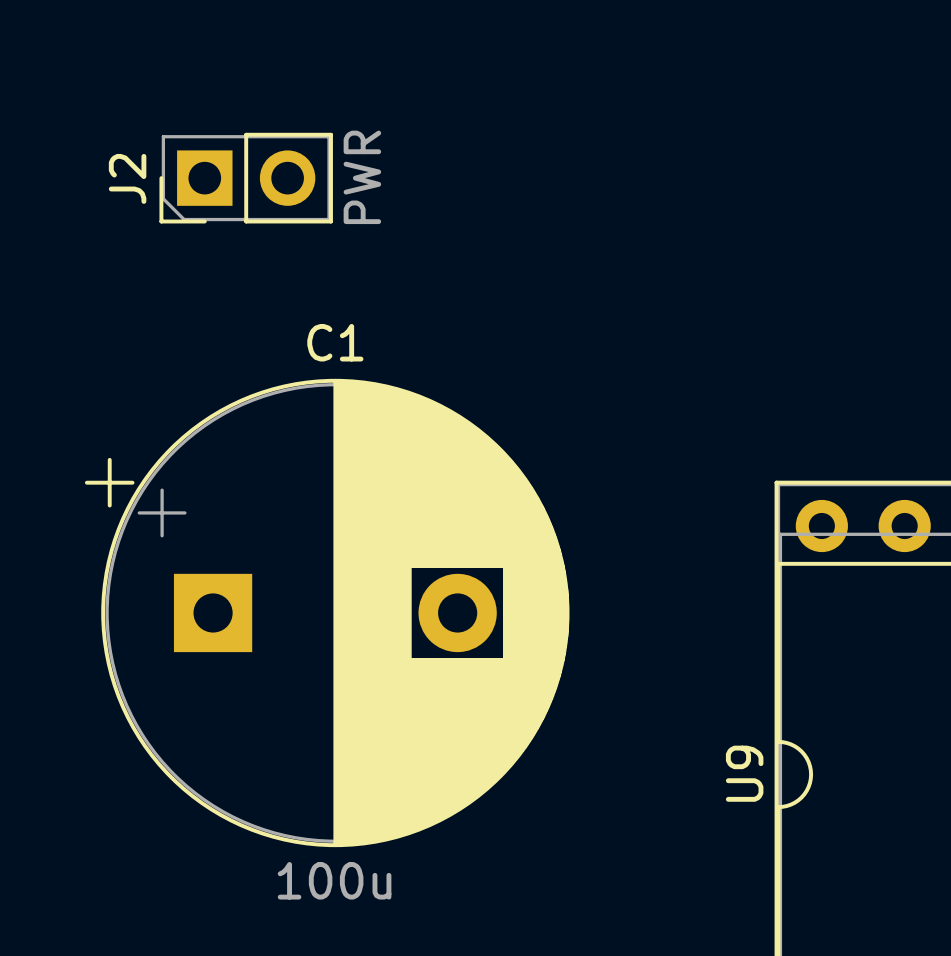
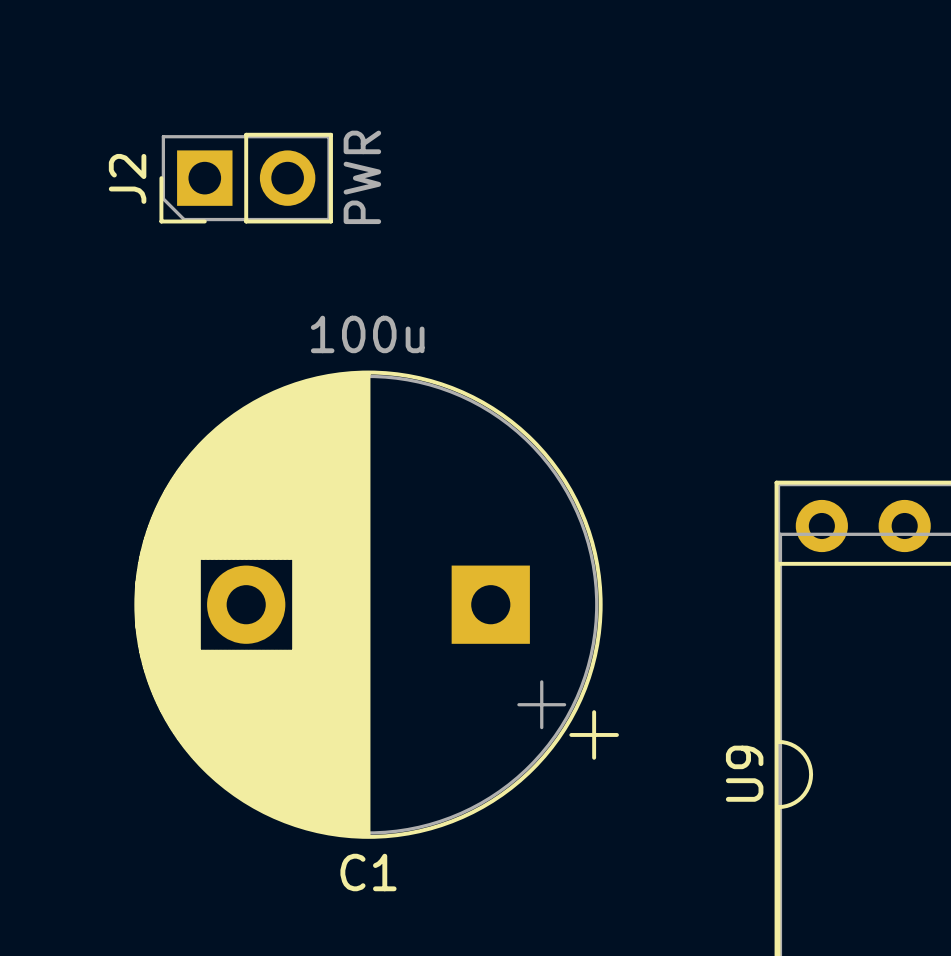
C1 rotation: 0° (327, 612) -> 180° (376, 604)

